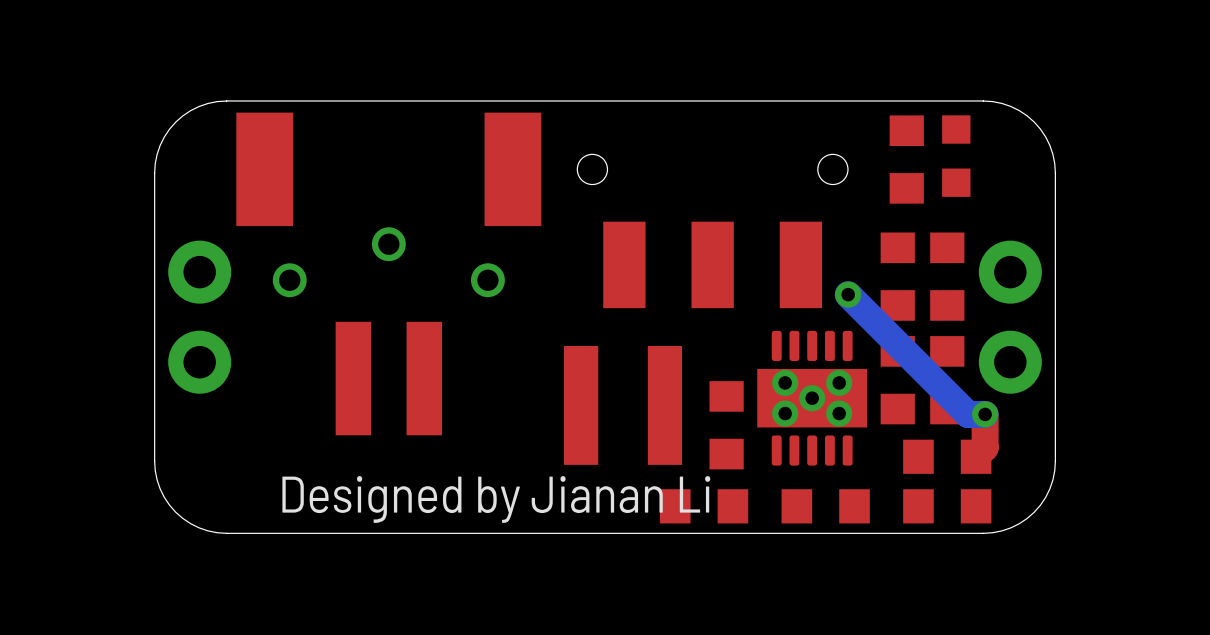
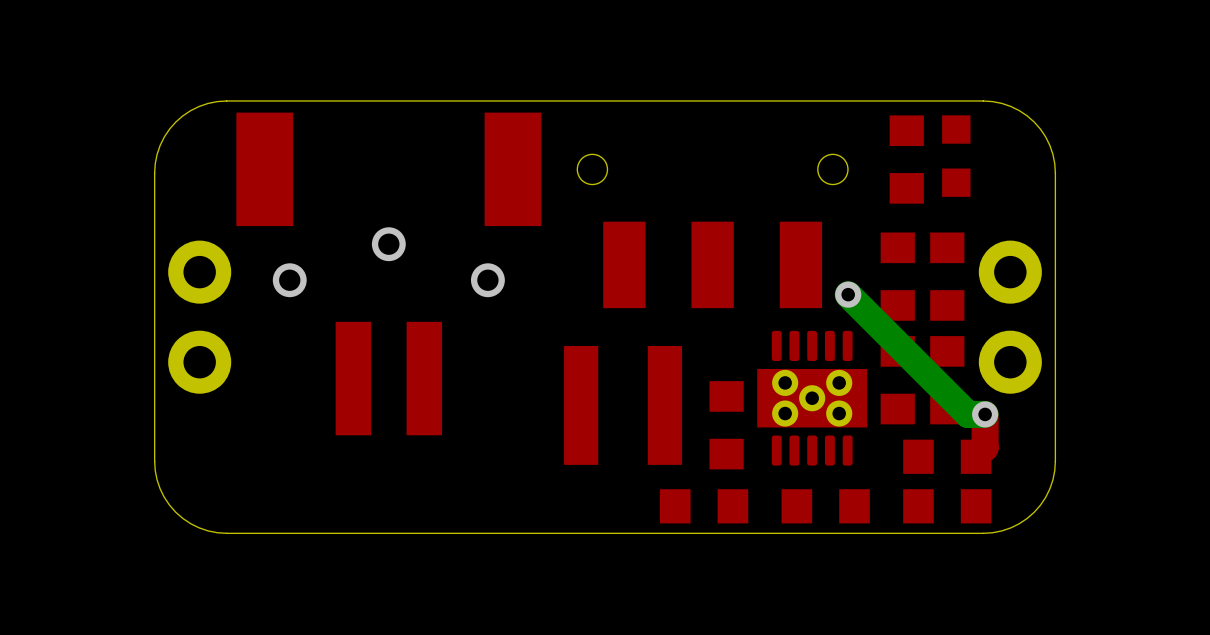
text: Designed by Jianan Li (496, 499) -> none

